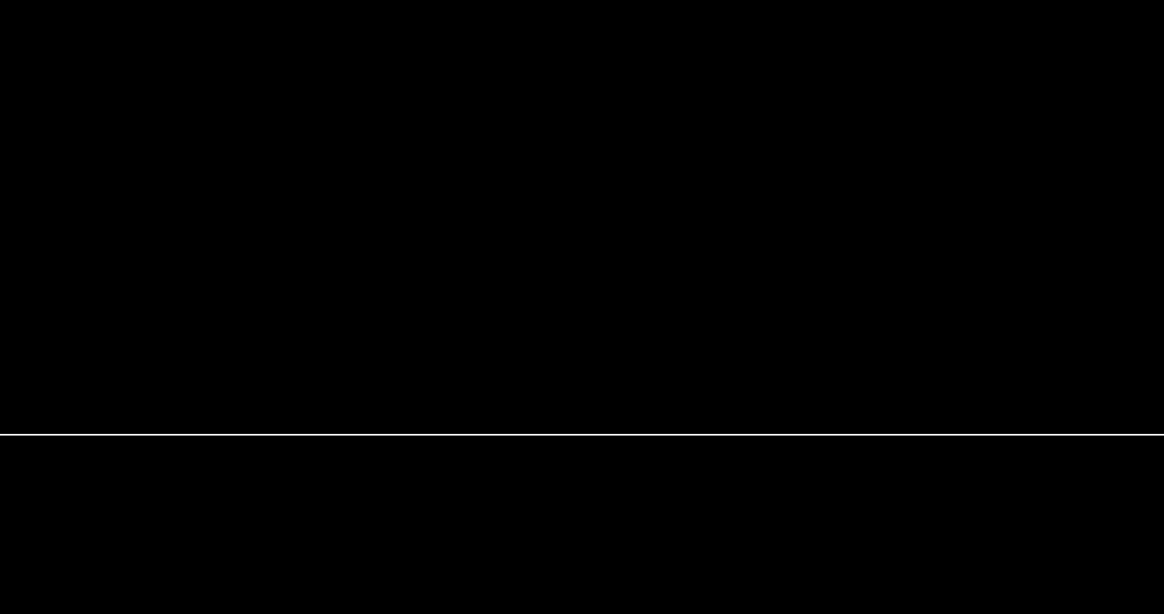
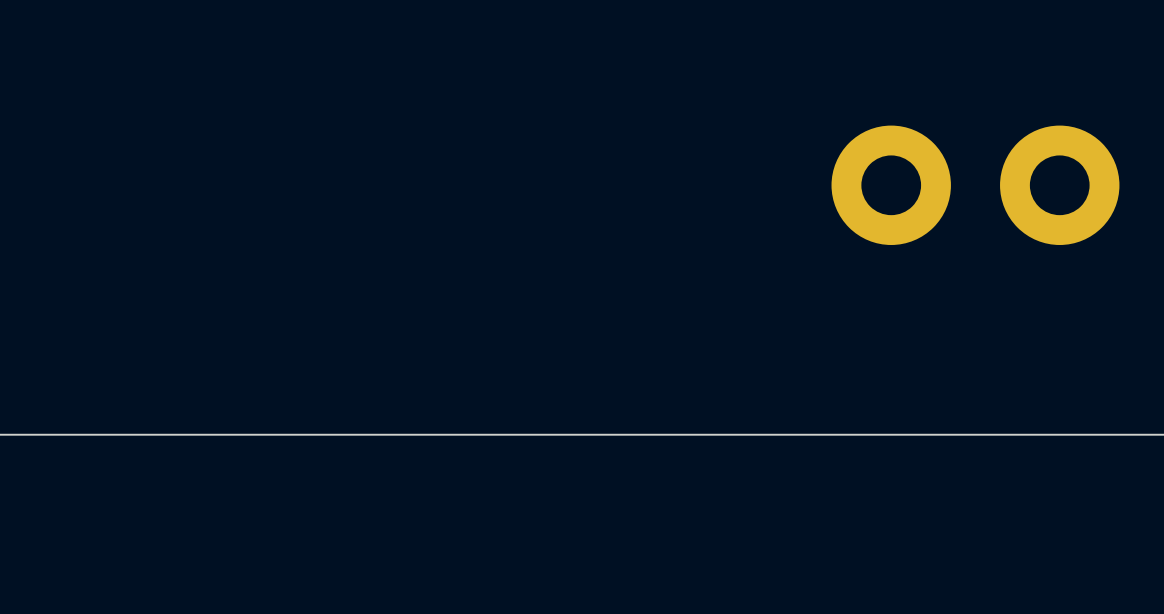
part: none -> (975, 185)

